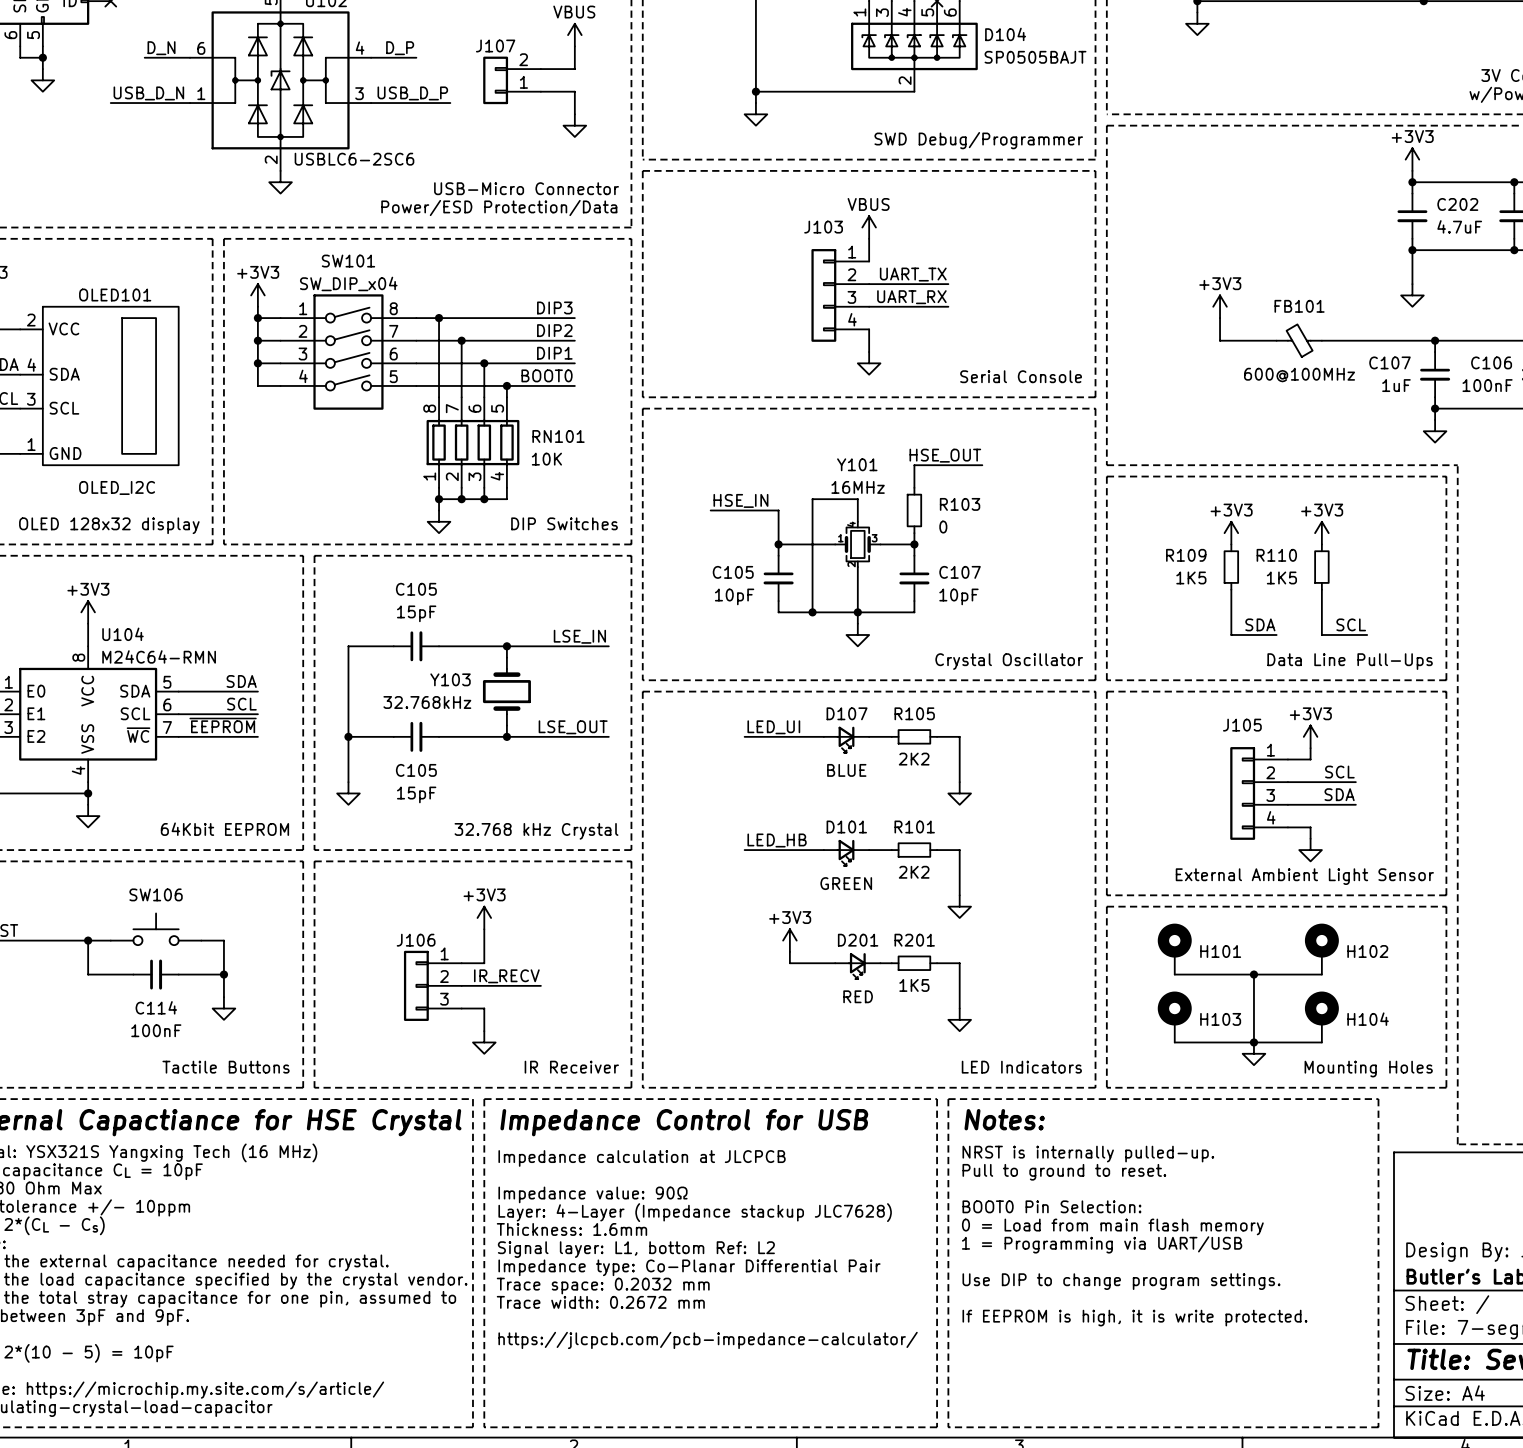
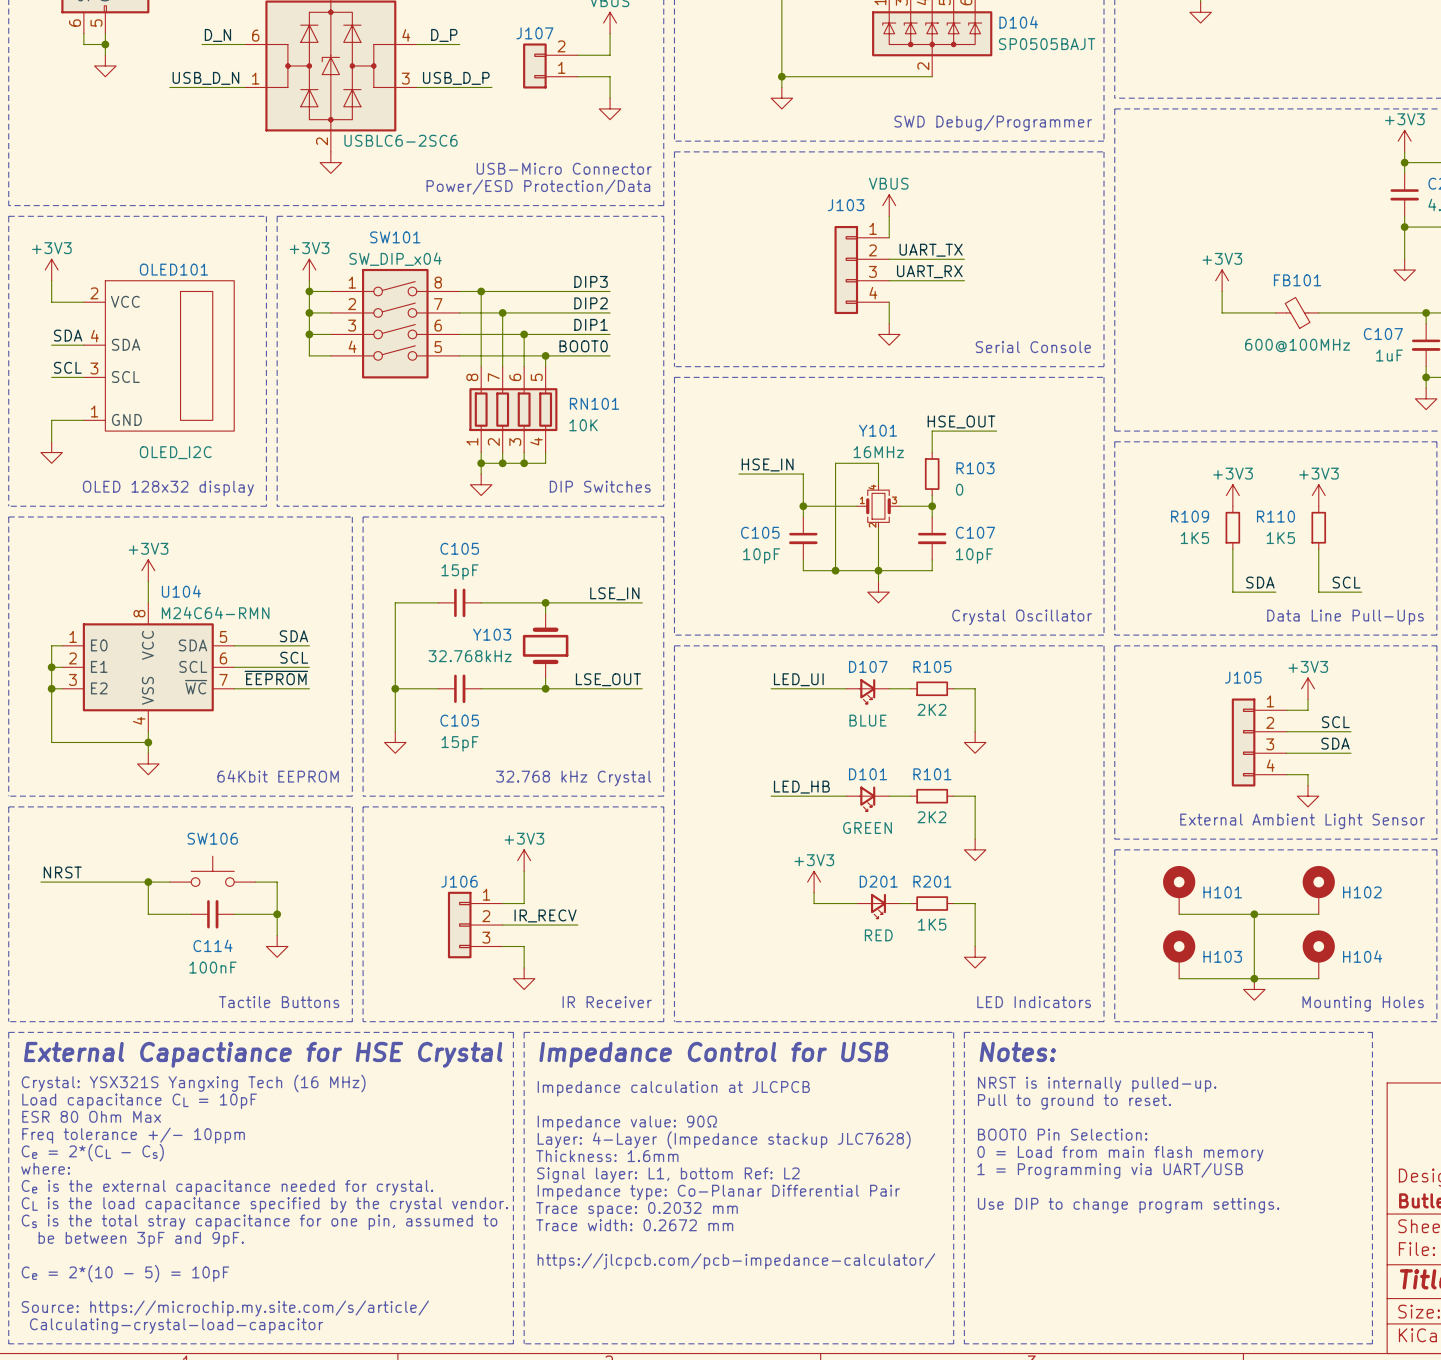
text: If EEPROM is high, it is write protected. (1134, 1318) -> none

